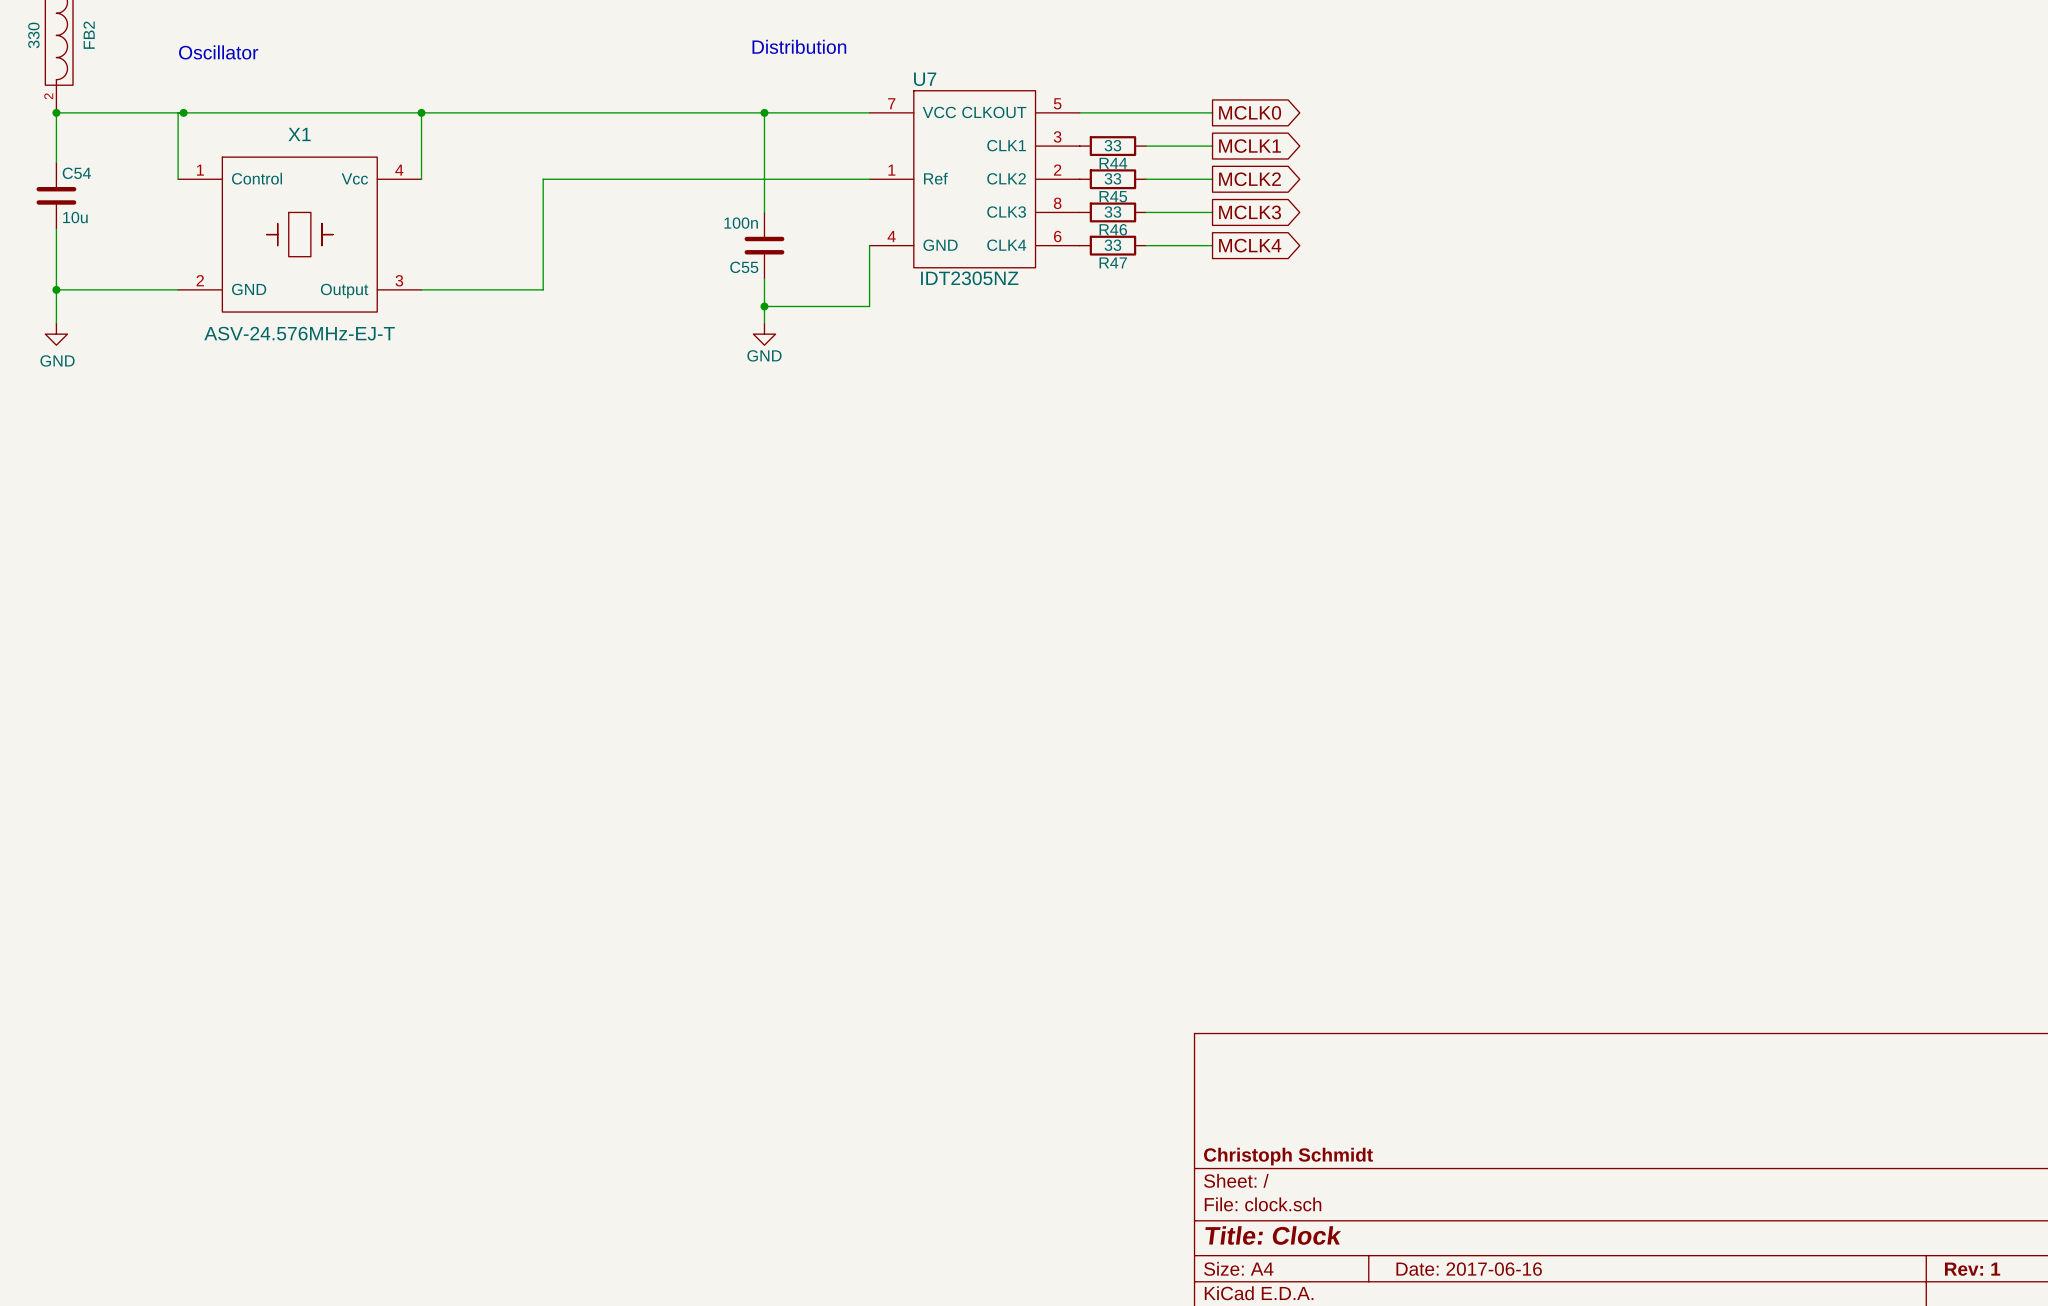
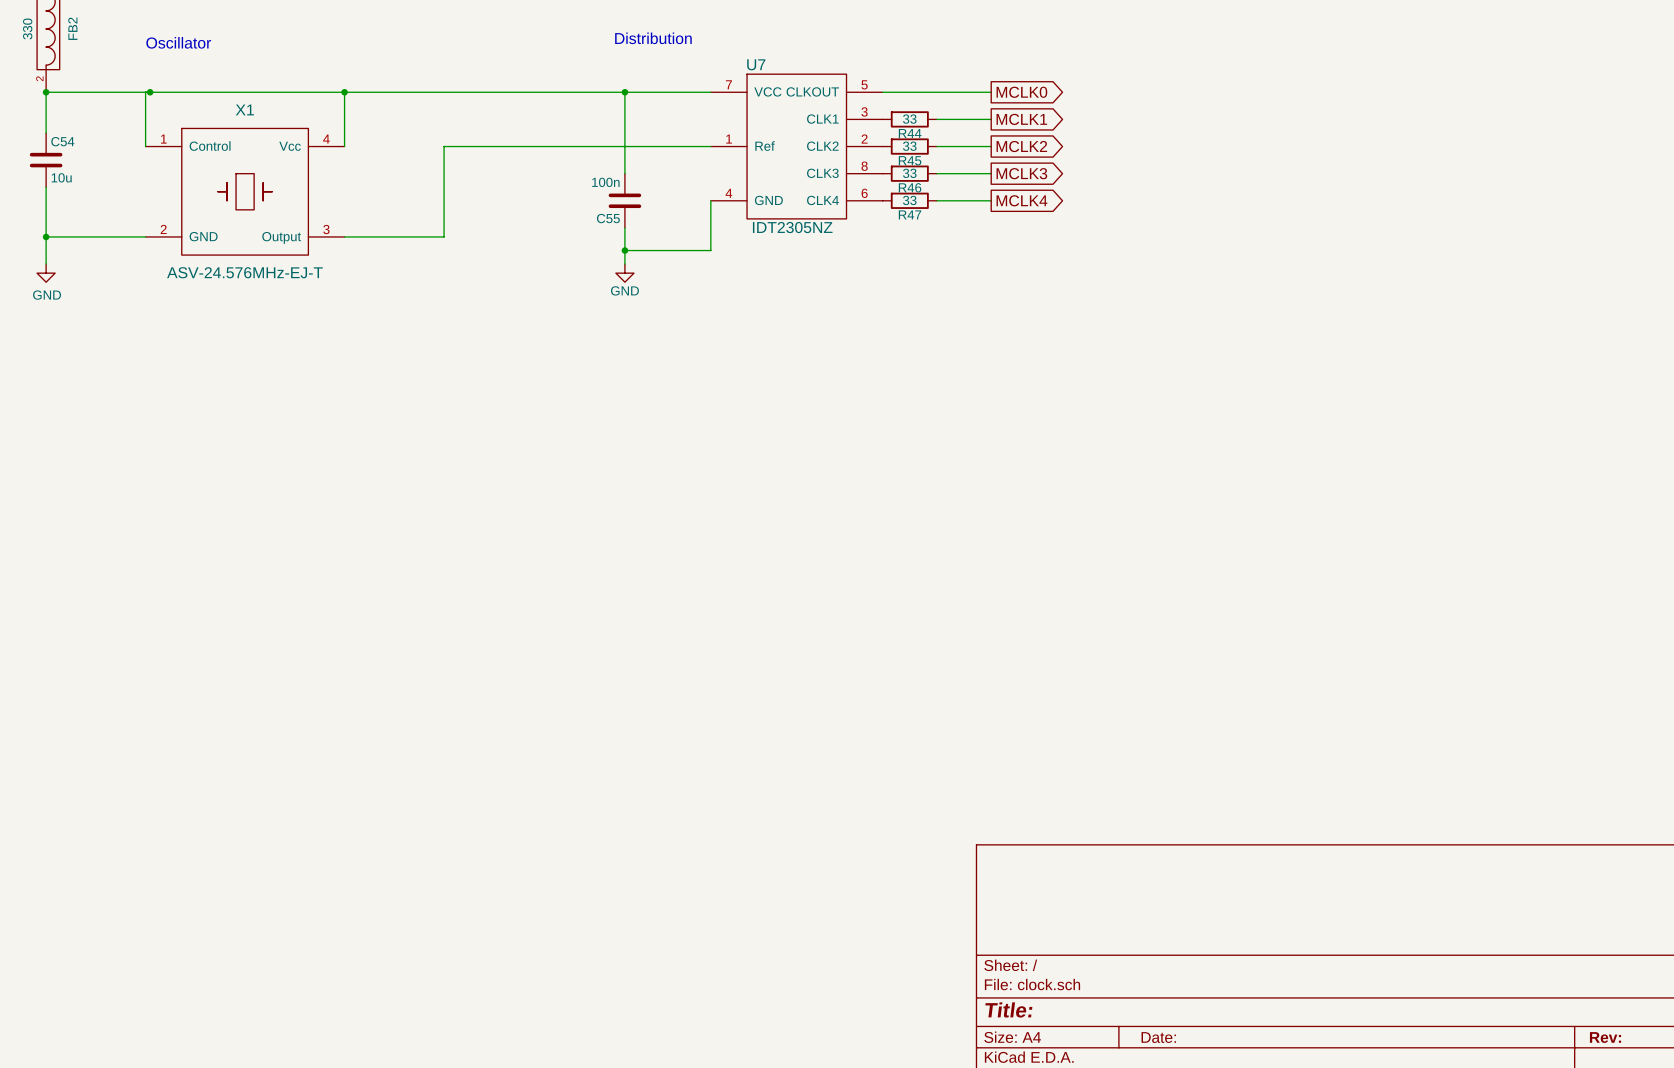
title block: Christoph Schmidt (1288, 1156) -> none
title block: Title: Clock (1273, 1235) -> Title: (1008, 1009)
title block: Date: 2017-06-16 (1469, 1269) -> Date: (1158, 1037)
title block: Rev: 1 (1972, 1269) -> Rev: (1605, 1037)

